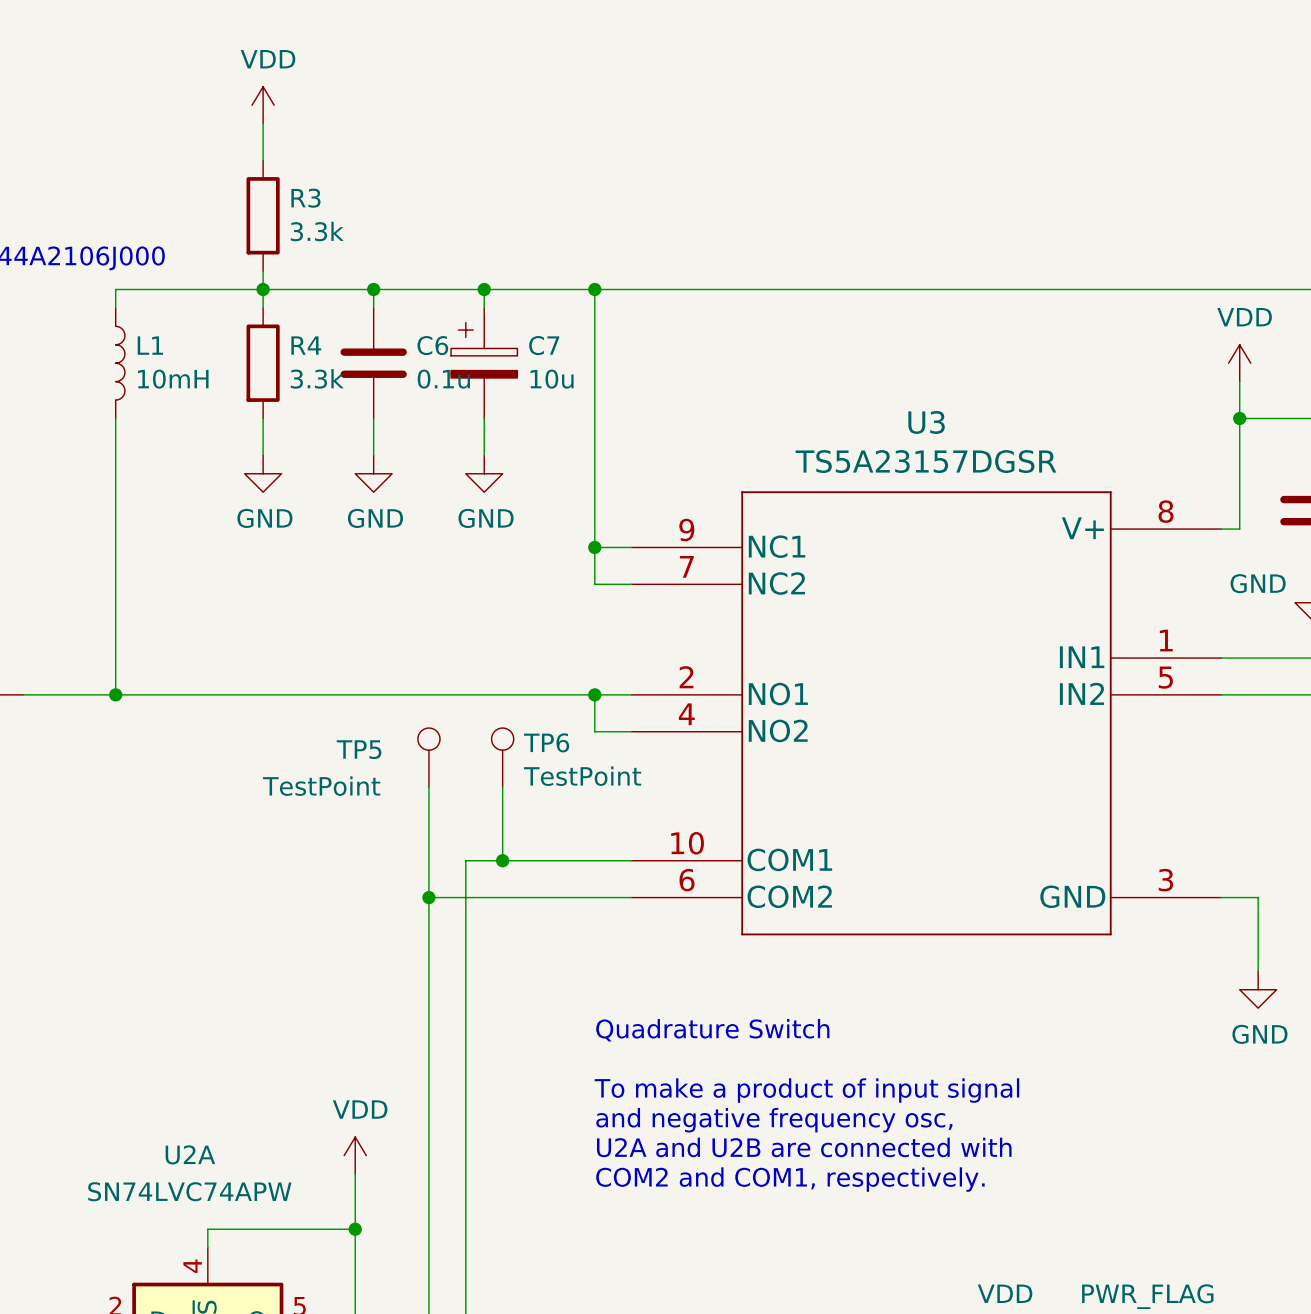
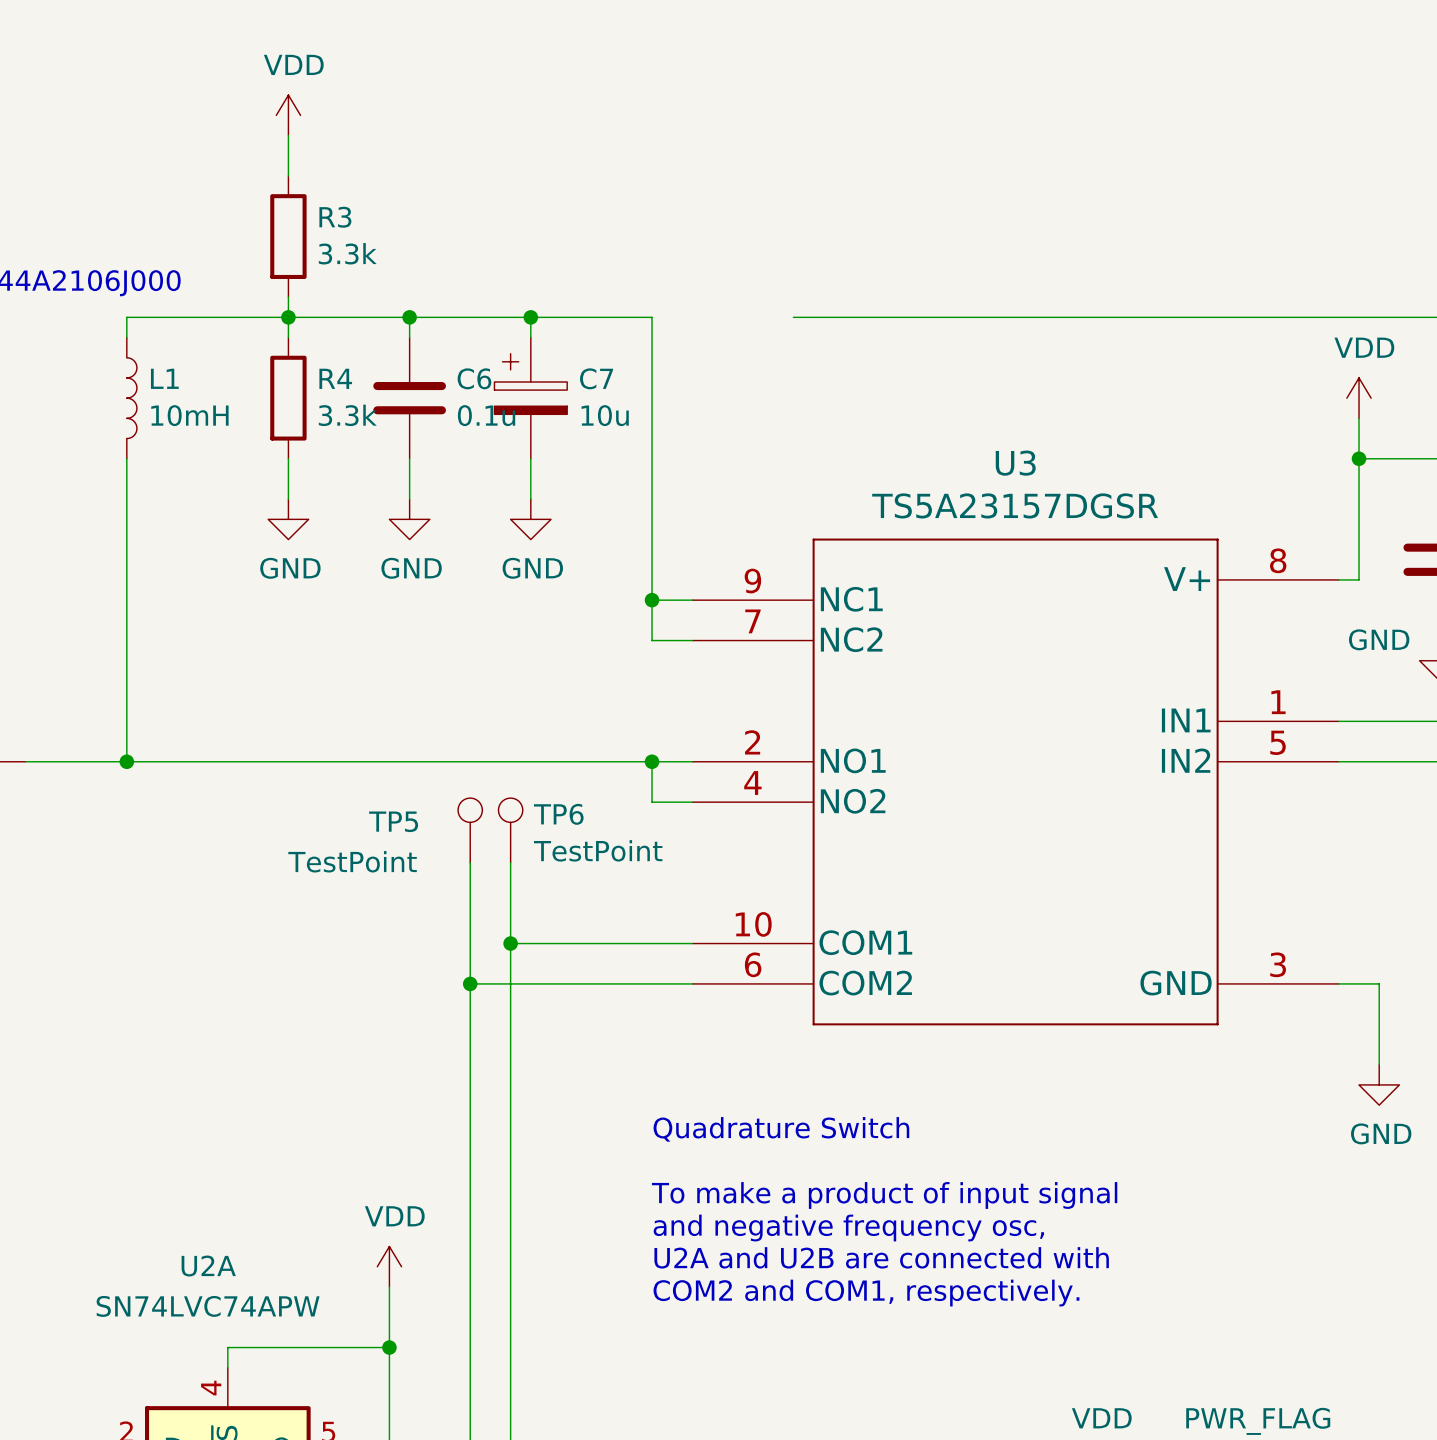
wire: (594, 289) (723, 289) -> none
junction: (594, 289) -> none
TP6 position: (502, 757) -> (510, 830)
wire: (502, 787) (502, 860) -> (510, 862) (510, 943)
junction position: (502, 860) -> (510, 943)

